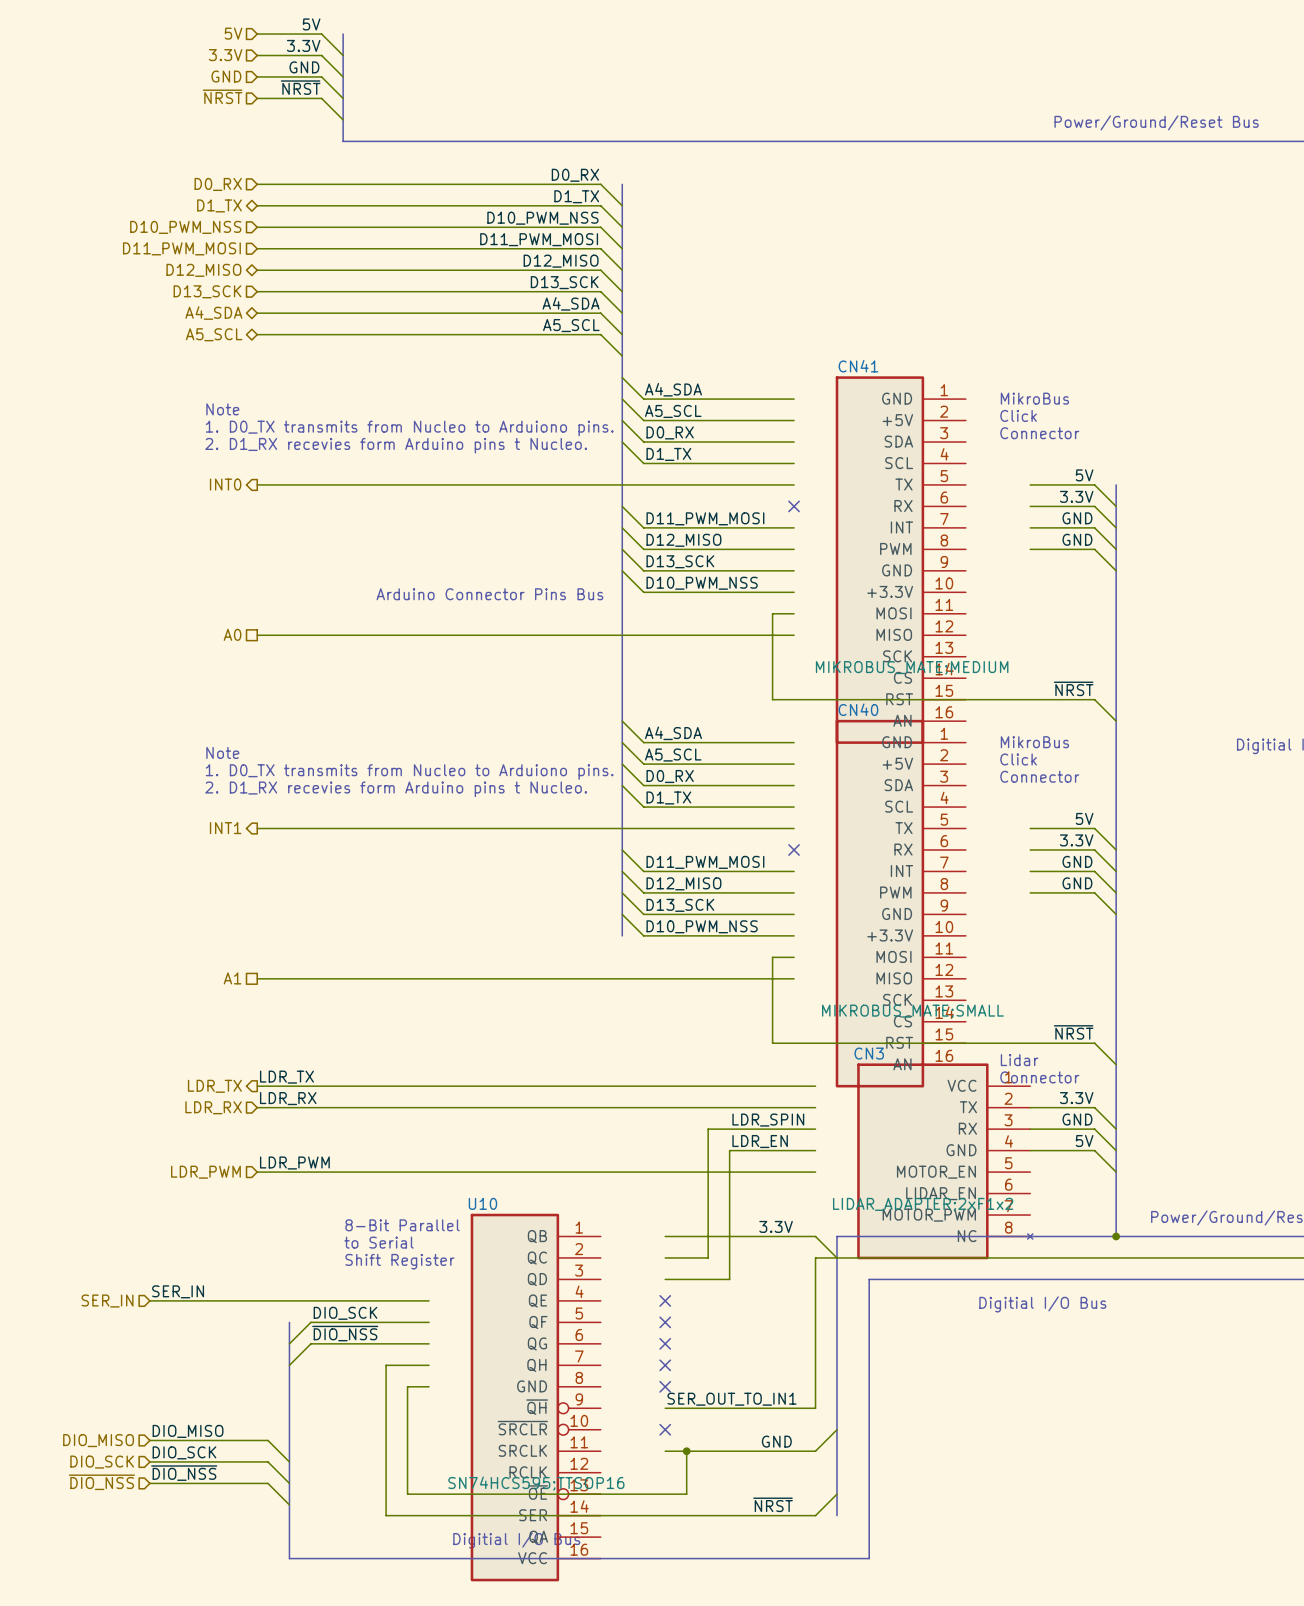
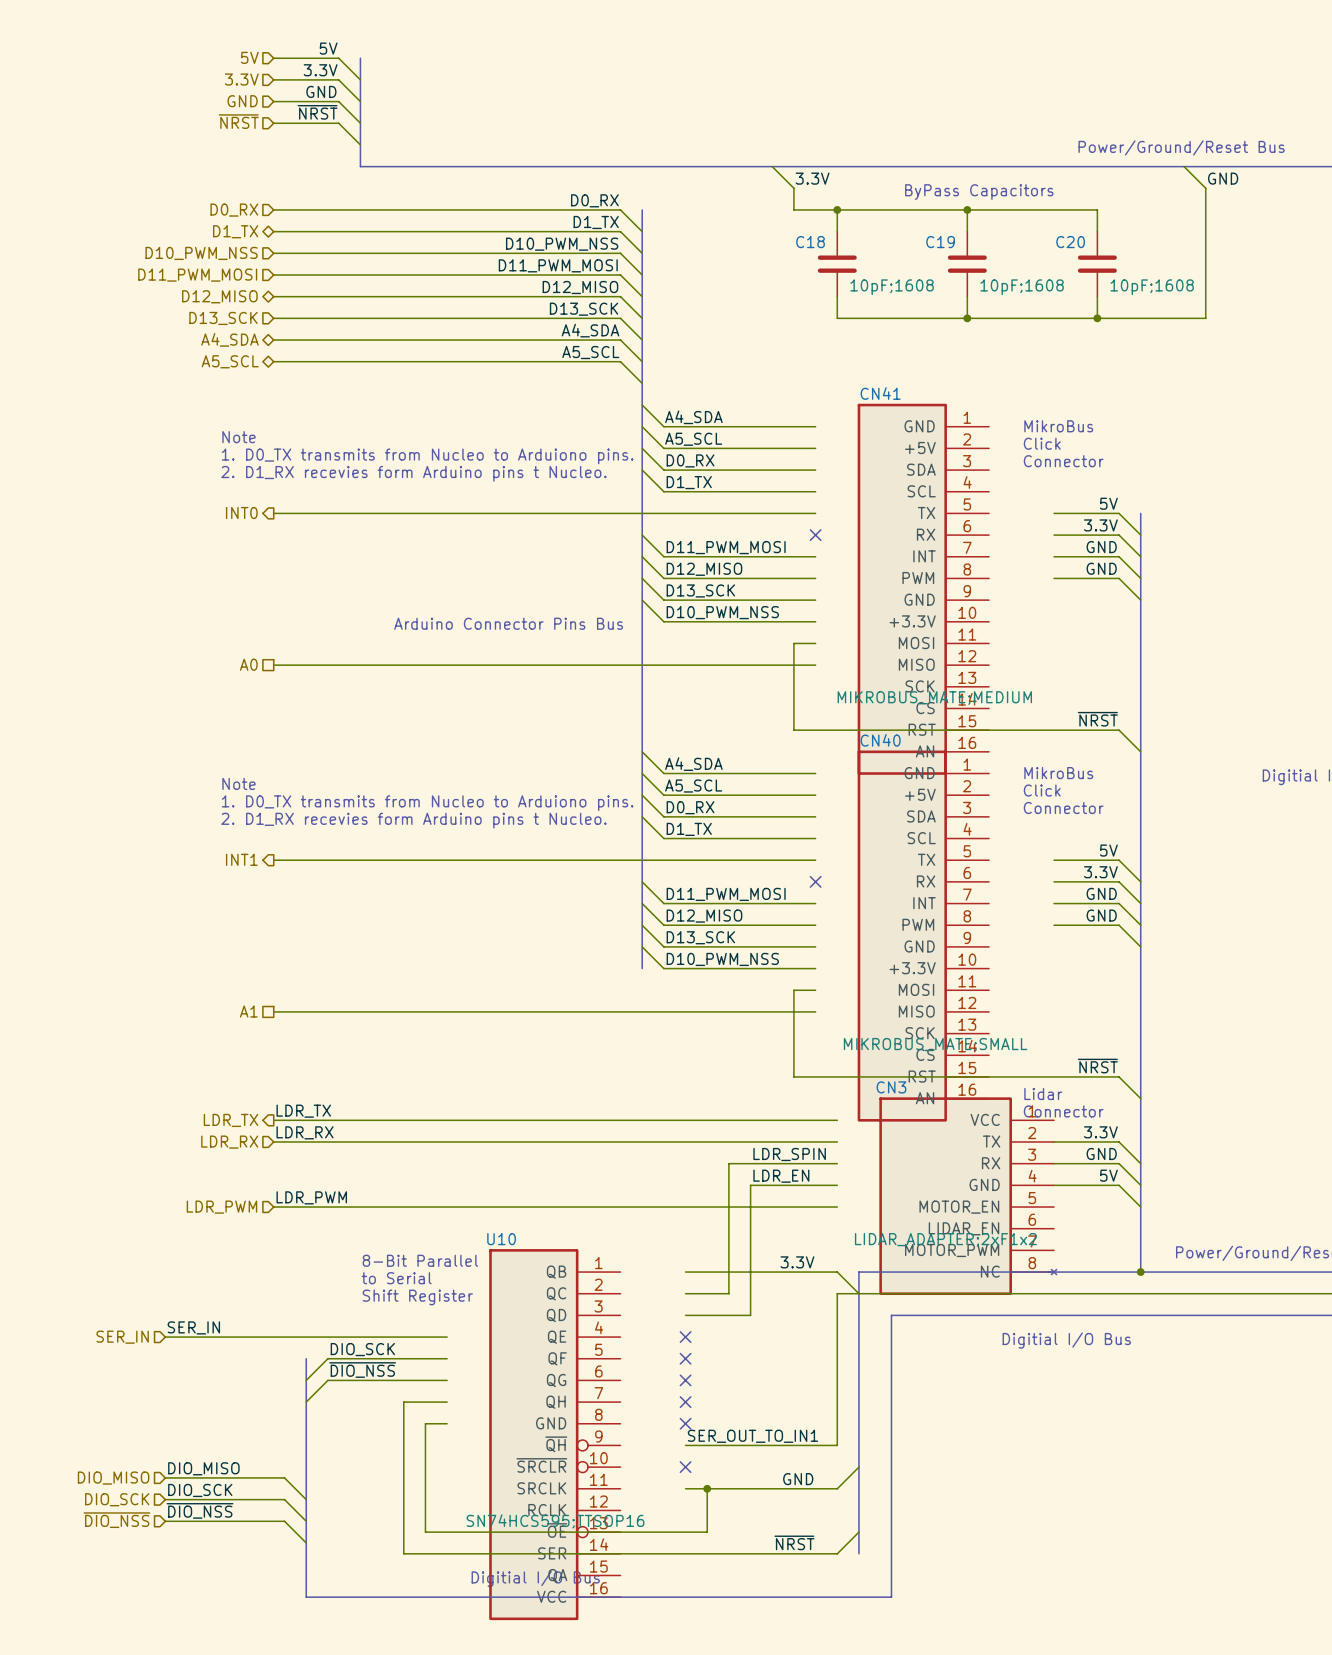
wire: none -> (772, 166) (793, 188) (793, 209) (1097, 209) (1097, 231)
wire: none -> (1184, 166) (1205, 188) (1205, 318) (837, 318) (837, 296)
label: none -> 3.3V (812, 178)
label: none -> GND (1223, 178)
text: none -> ByPass Capacitors (979, 192)
wire: none -> (837, 209) (837, 231)
junction: none -> (837, 209)
wire: none -> (967, 209) (967, 231)
junction: none -> (967, 209)
C18: none -> 10pF;1608 (837, 264)
C19: none -> 10pF;1608 (967, 264)
C20: none -> 10pF;1608 (1097, 264)
wire: none -> (967, 296) (967, 318)
wire: none -> (1097, 296) (1097, 318)
junction: none -> (967, 318)
junction: none -> (1097, 318)

